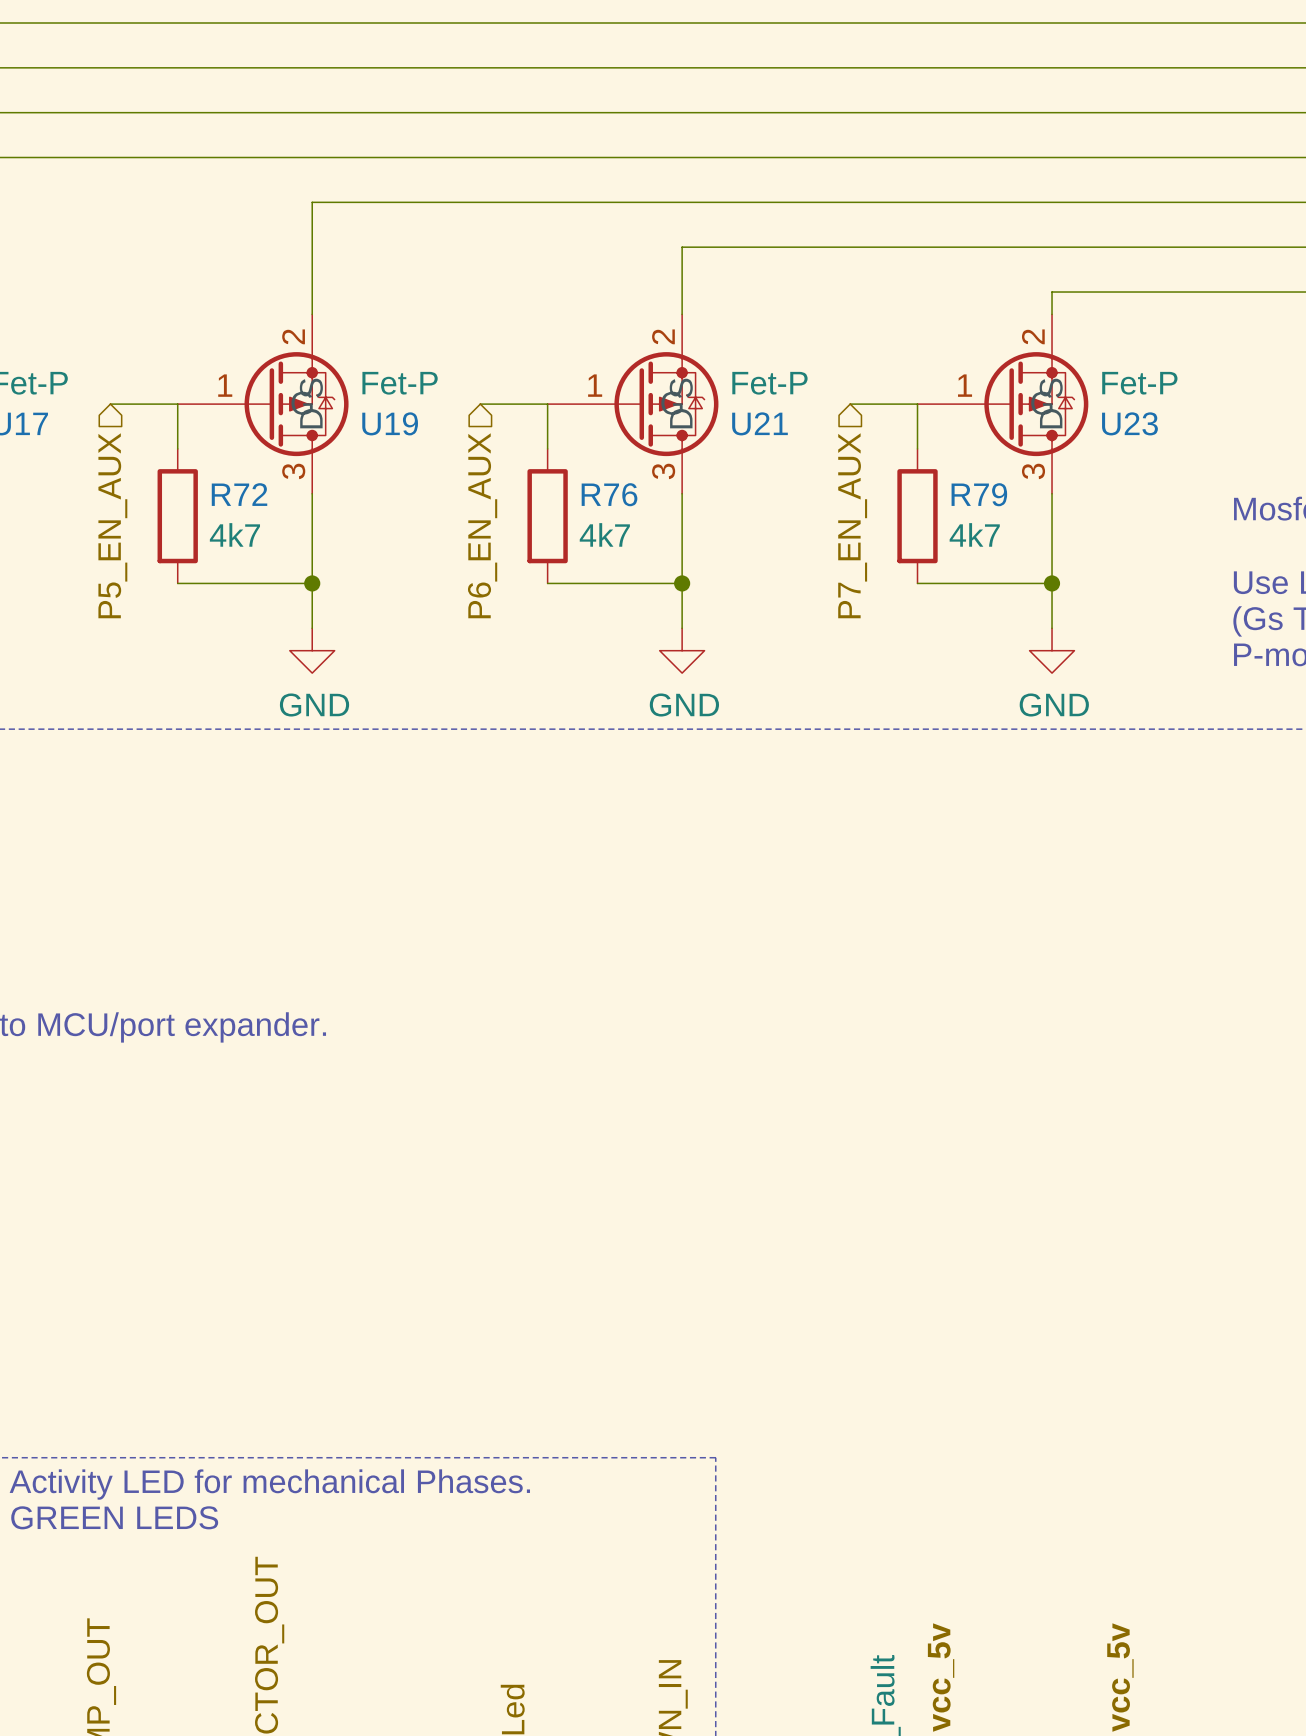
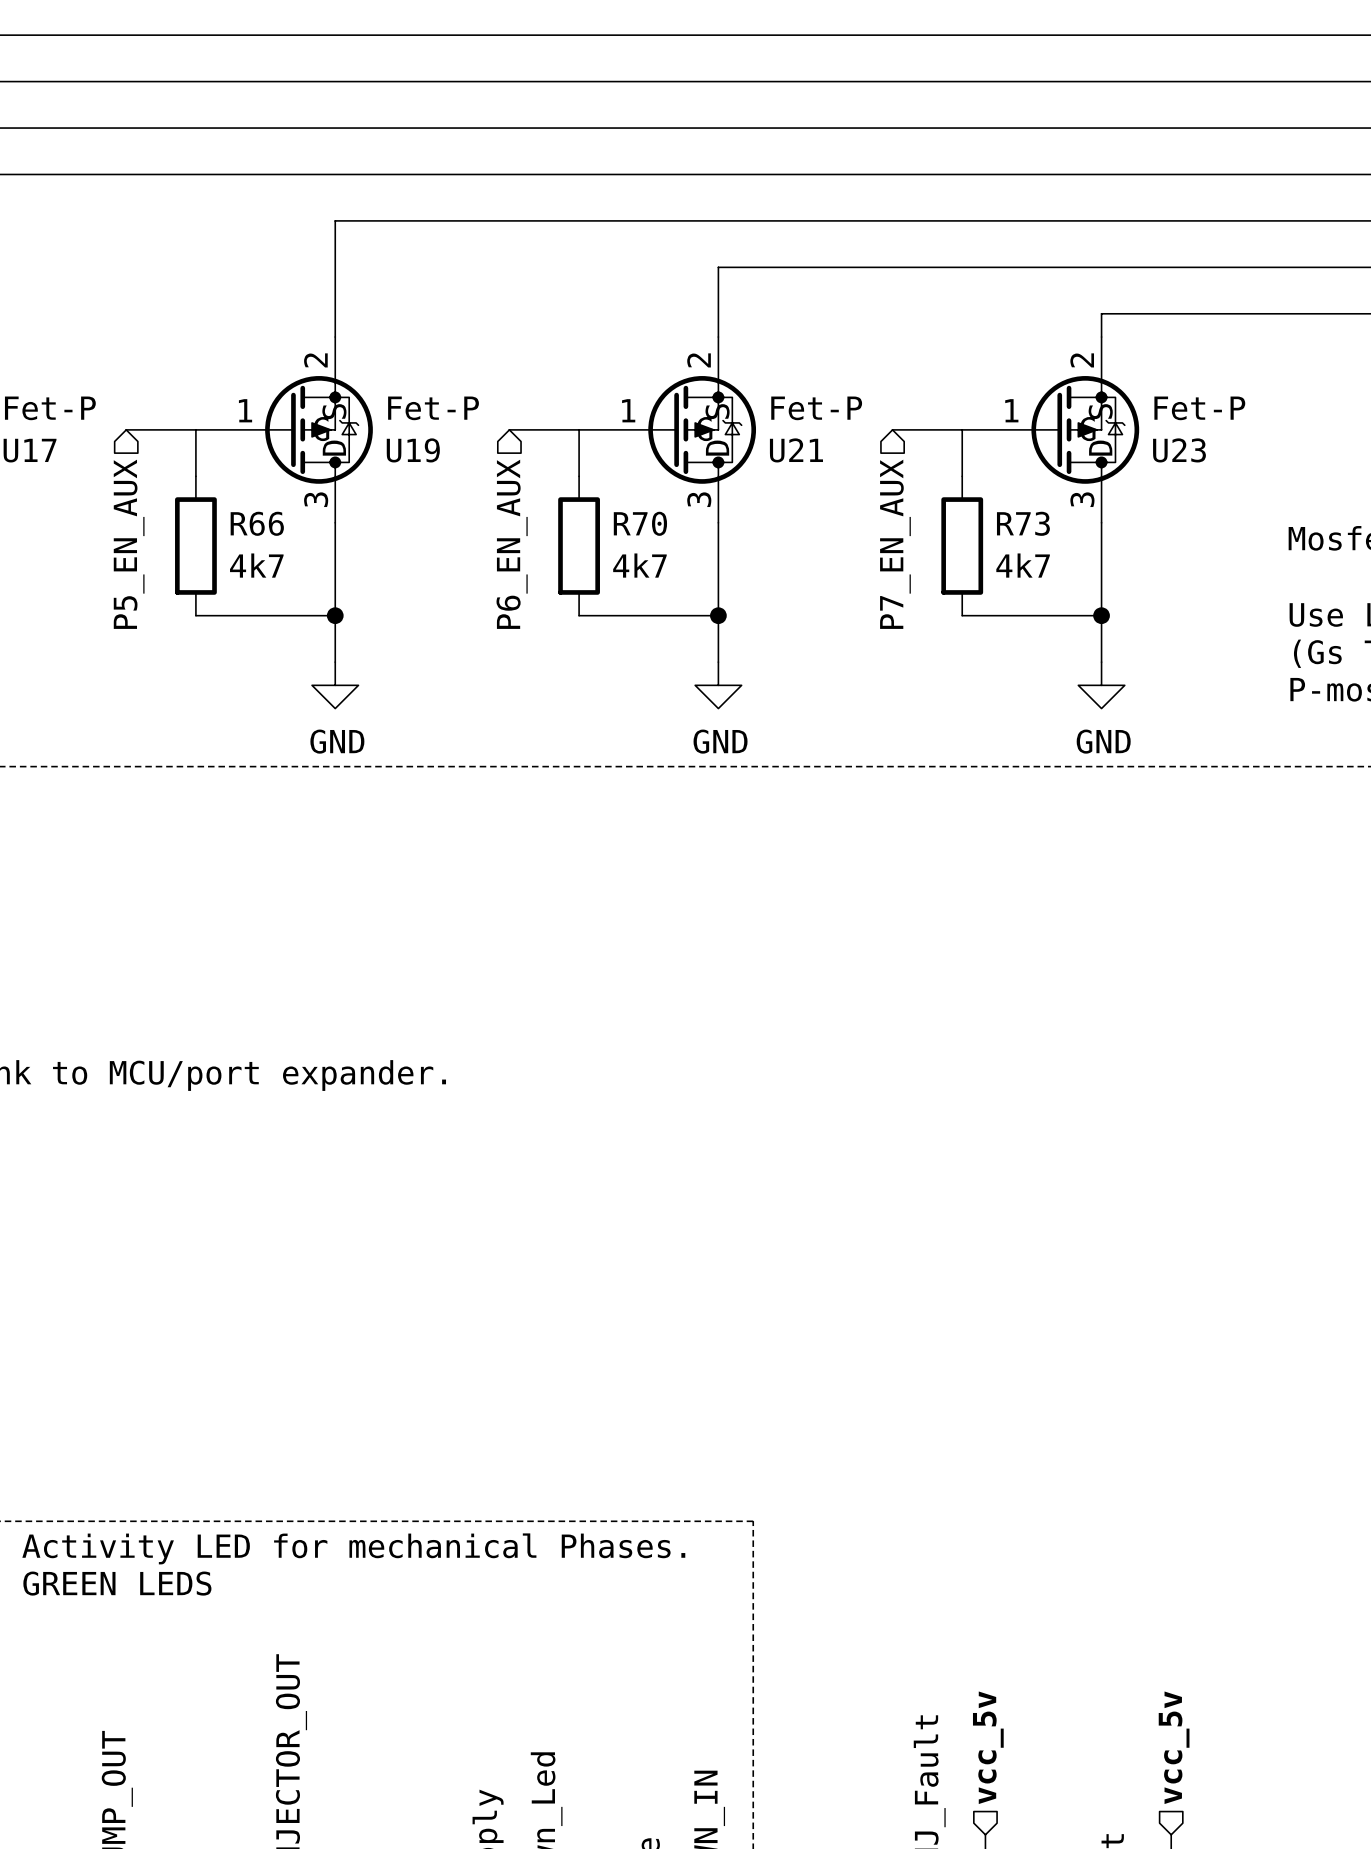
R72 name: R72 (239, 494) -> R66 (257, 523)
R76 name: R76 (609, 494) -> R70 (640, 523)
R79 name: R79 (979, 494) -> R73 (1023, 523)

